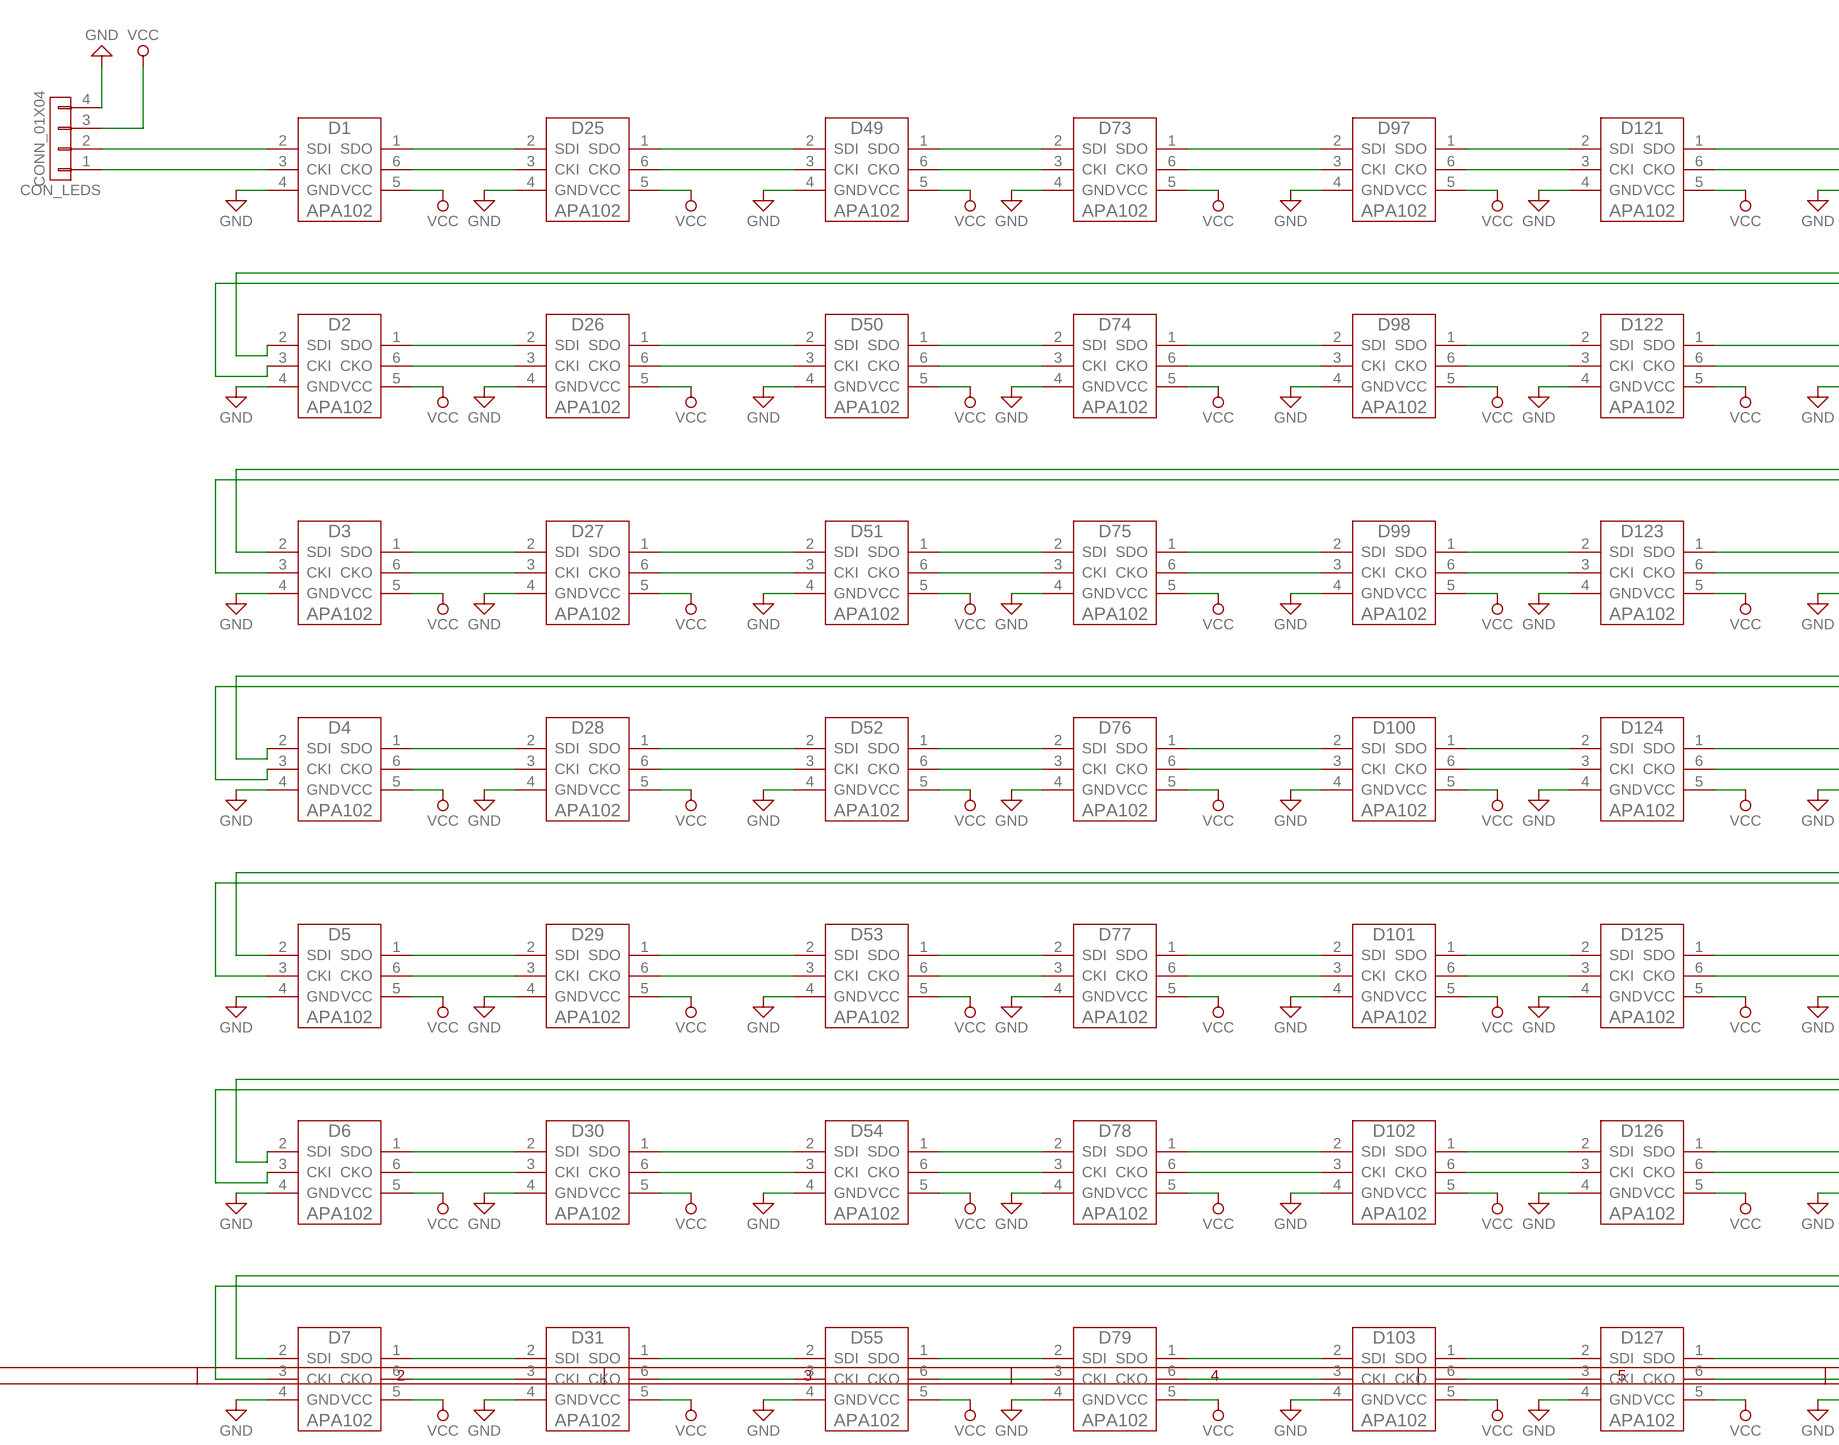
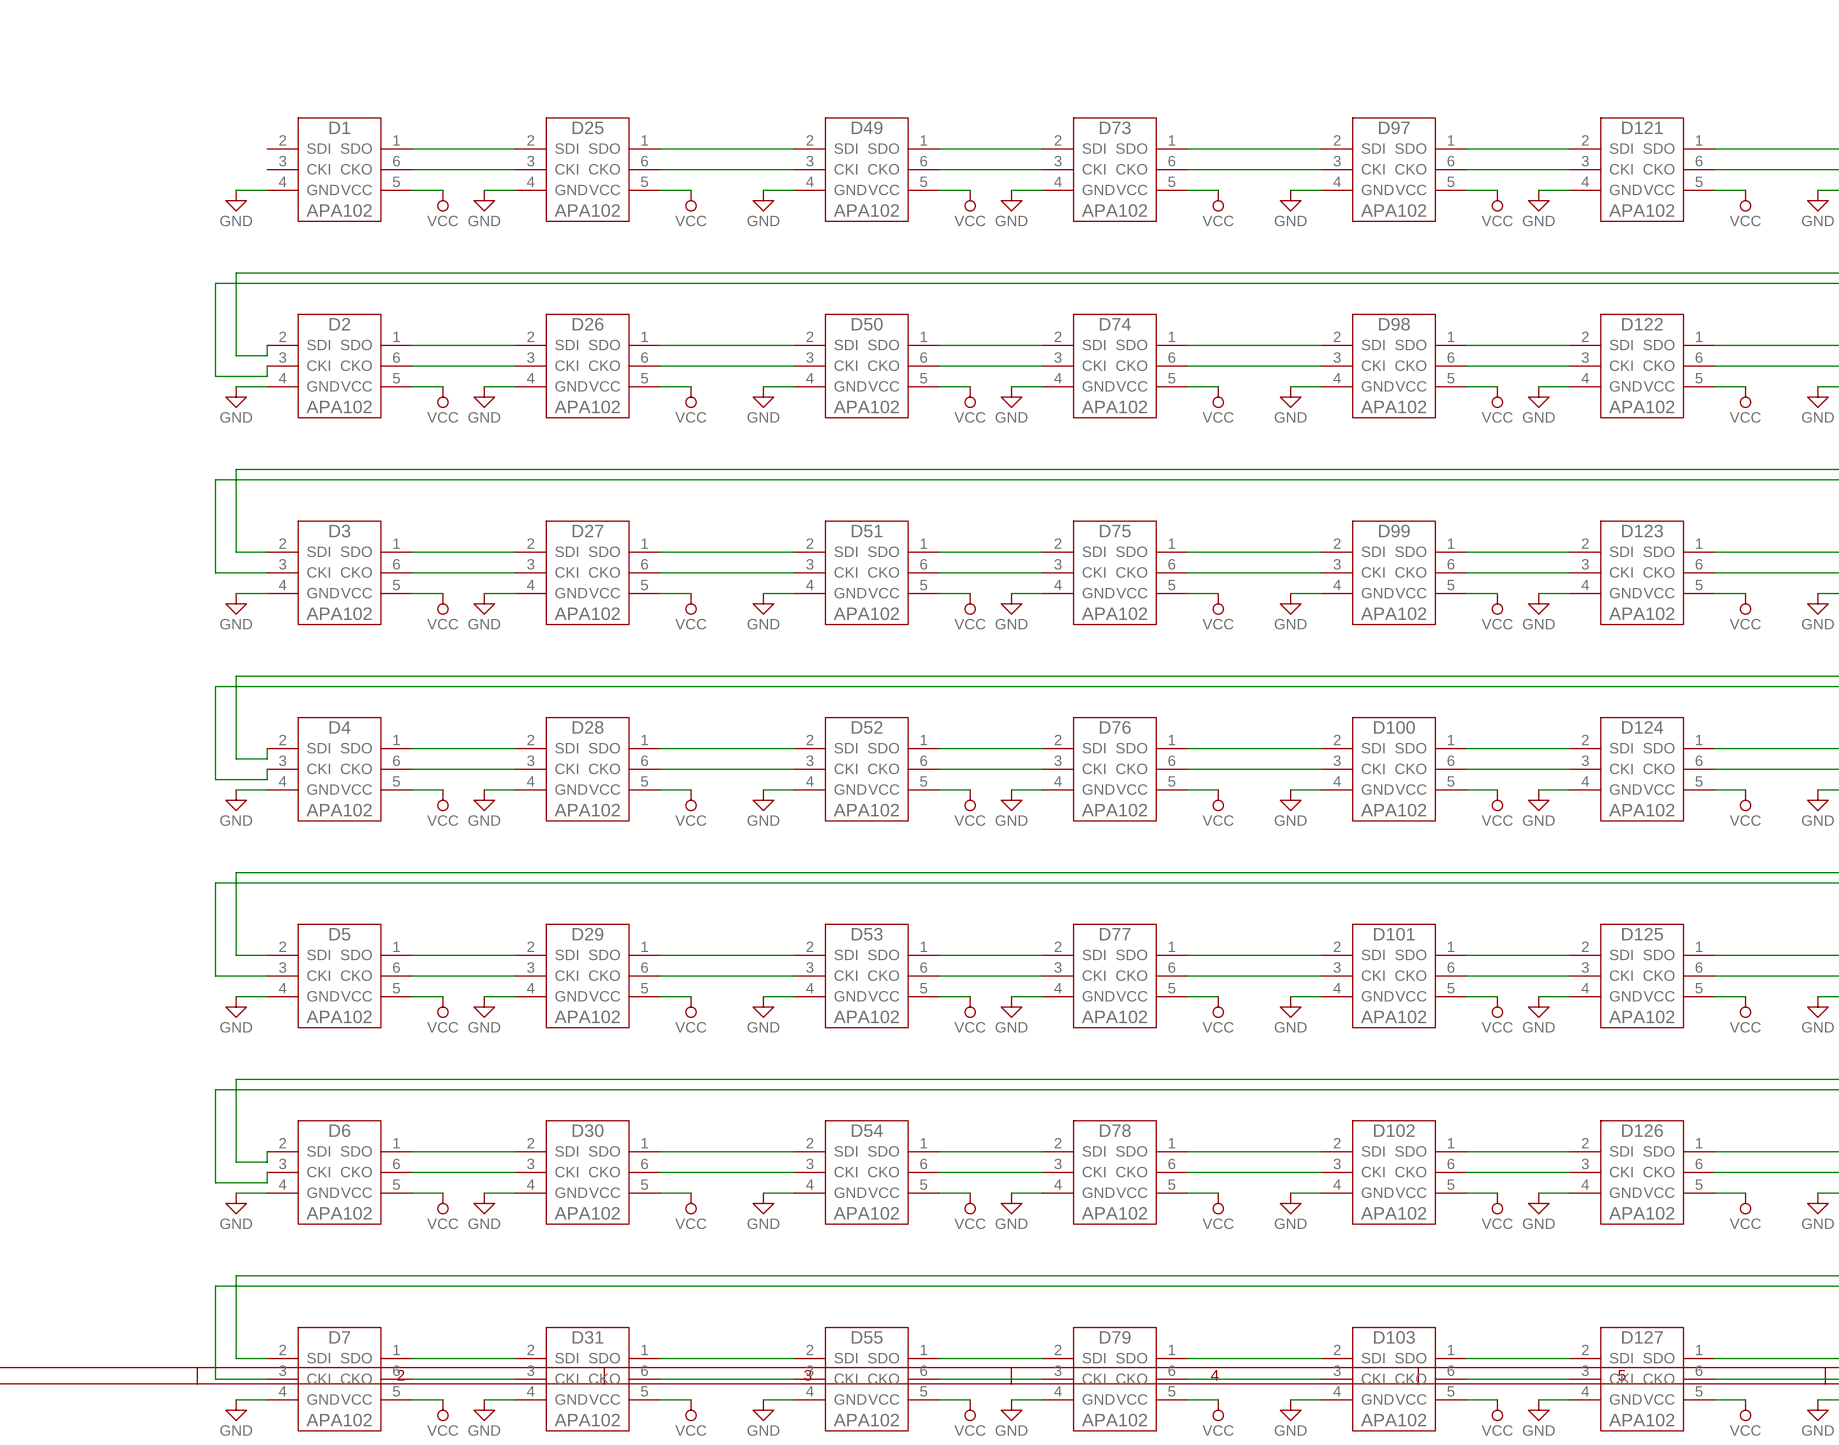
power symbol: GND (101, 55) -> none
power symbol: VCC (143, 55) -> none
wire: (101, 66) (101, 107) -> none
wire: (143, 66) (143, 128) (101, 128) -> none
CON_LEDS: CONN_01X04 (75, 138) -> none
wire: (101, 148) (267, 148) -> none
wire: (101, 169) (267, 169) -> none

